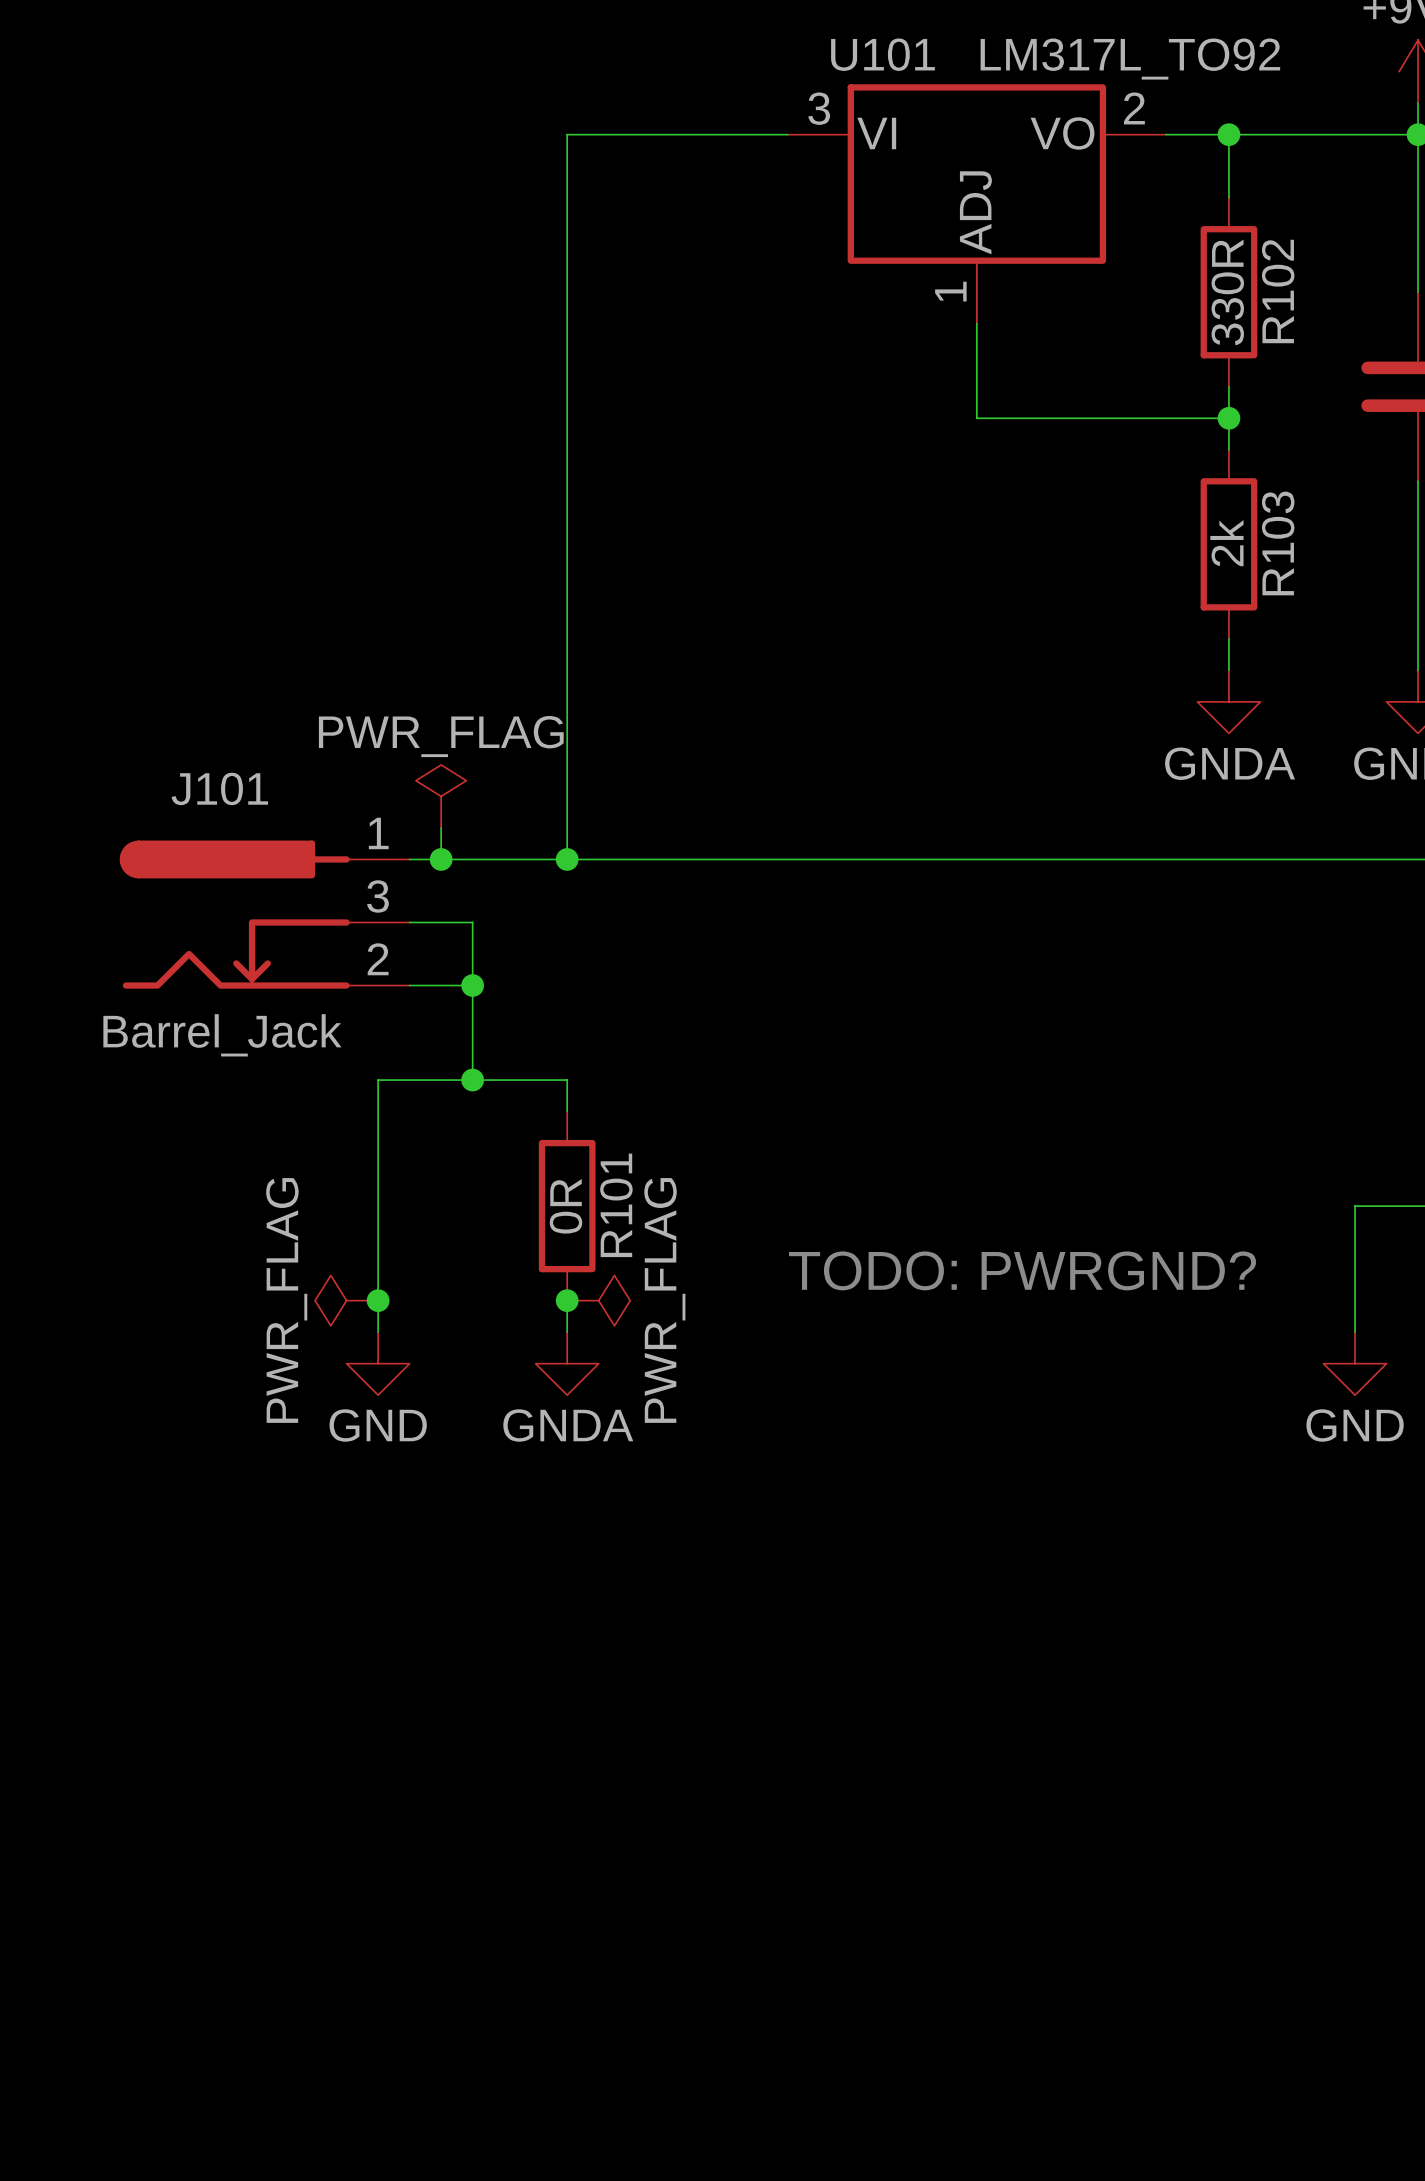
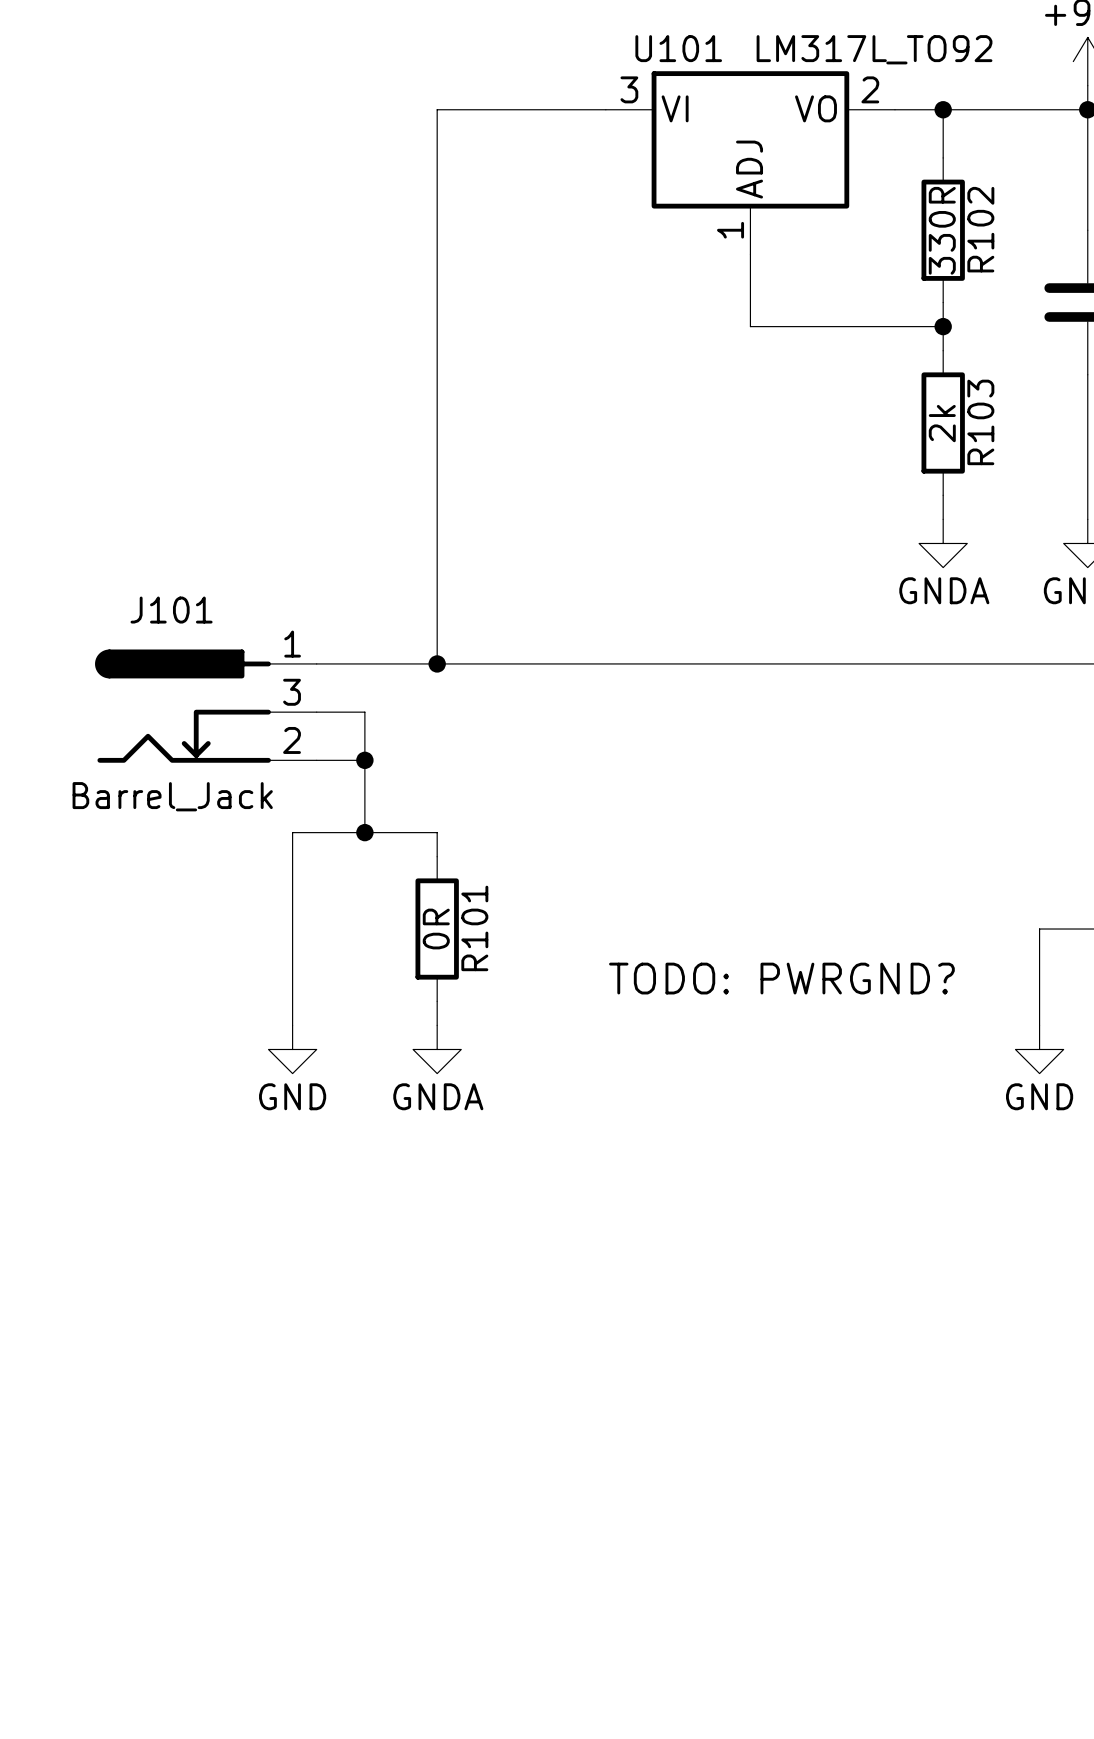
power symbol: PWR_FLAG (441, 796) -> none
wire: (441, 827) (441, 859) -> none
junction: (441, 859) -> none
power symbol: PWR_FLAG (346, 1300) -> none
junction: (378, 1300) -> none
junction: (567, 1300) -> none
power symbol: PWR_FLAG (598, 1300) -> none

